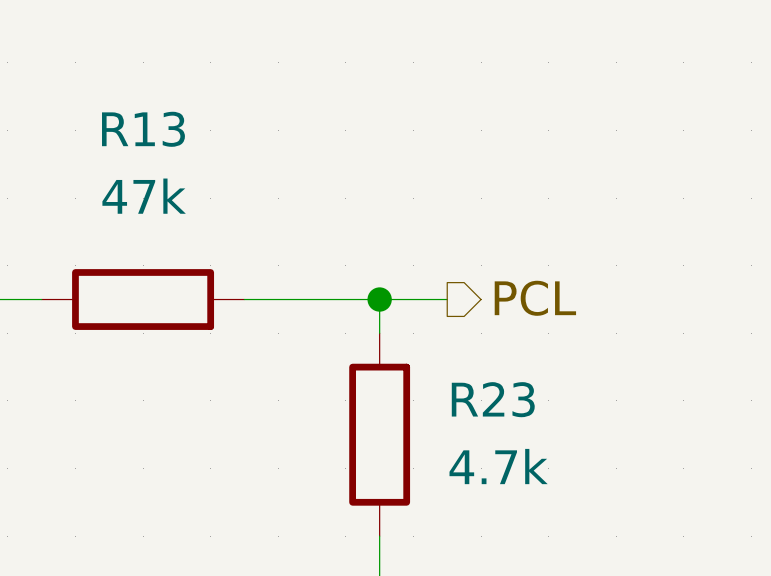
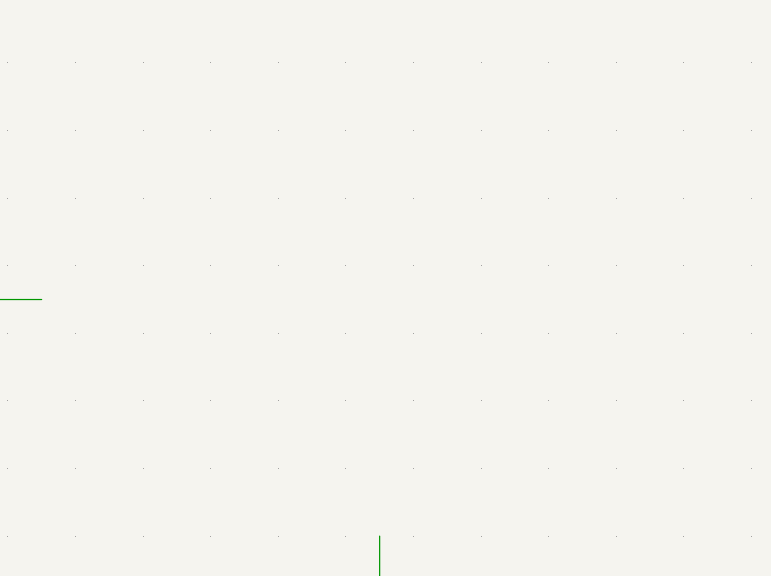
hierarchical label: PCL (535, 298) -> none
R13: 47k (143, 299) -> none
wire: (244, 299) (447, 299) -> none
wire: (379, 299) (379, 333) -> none
junction: (379, 299) -> none
R23: 4.7k (379, 434) -> none

